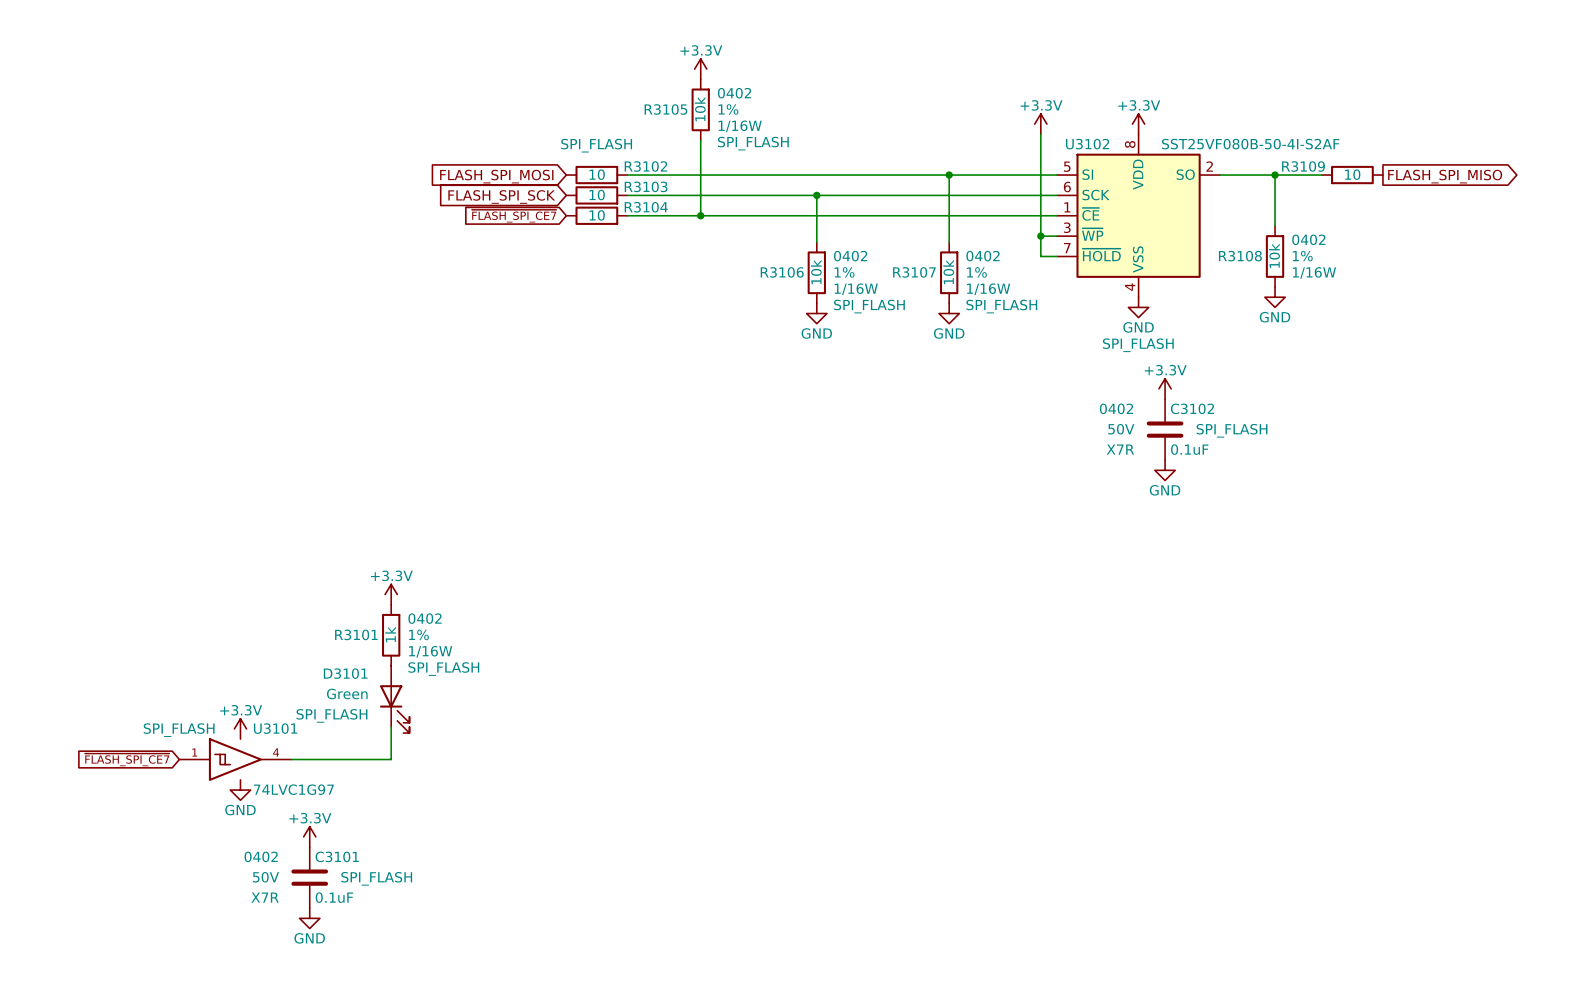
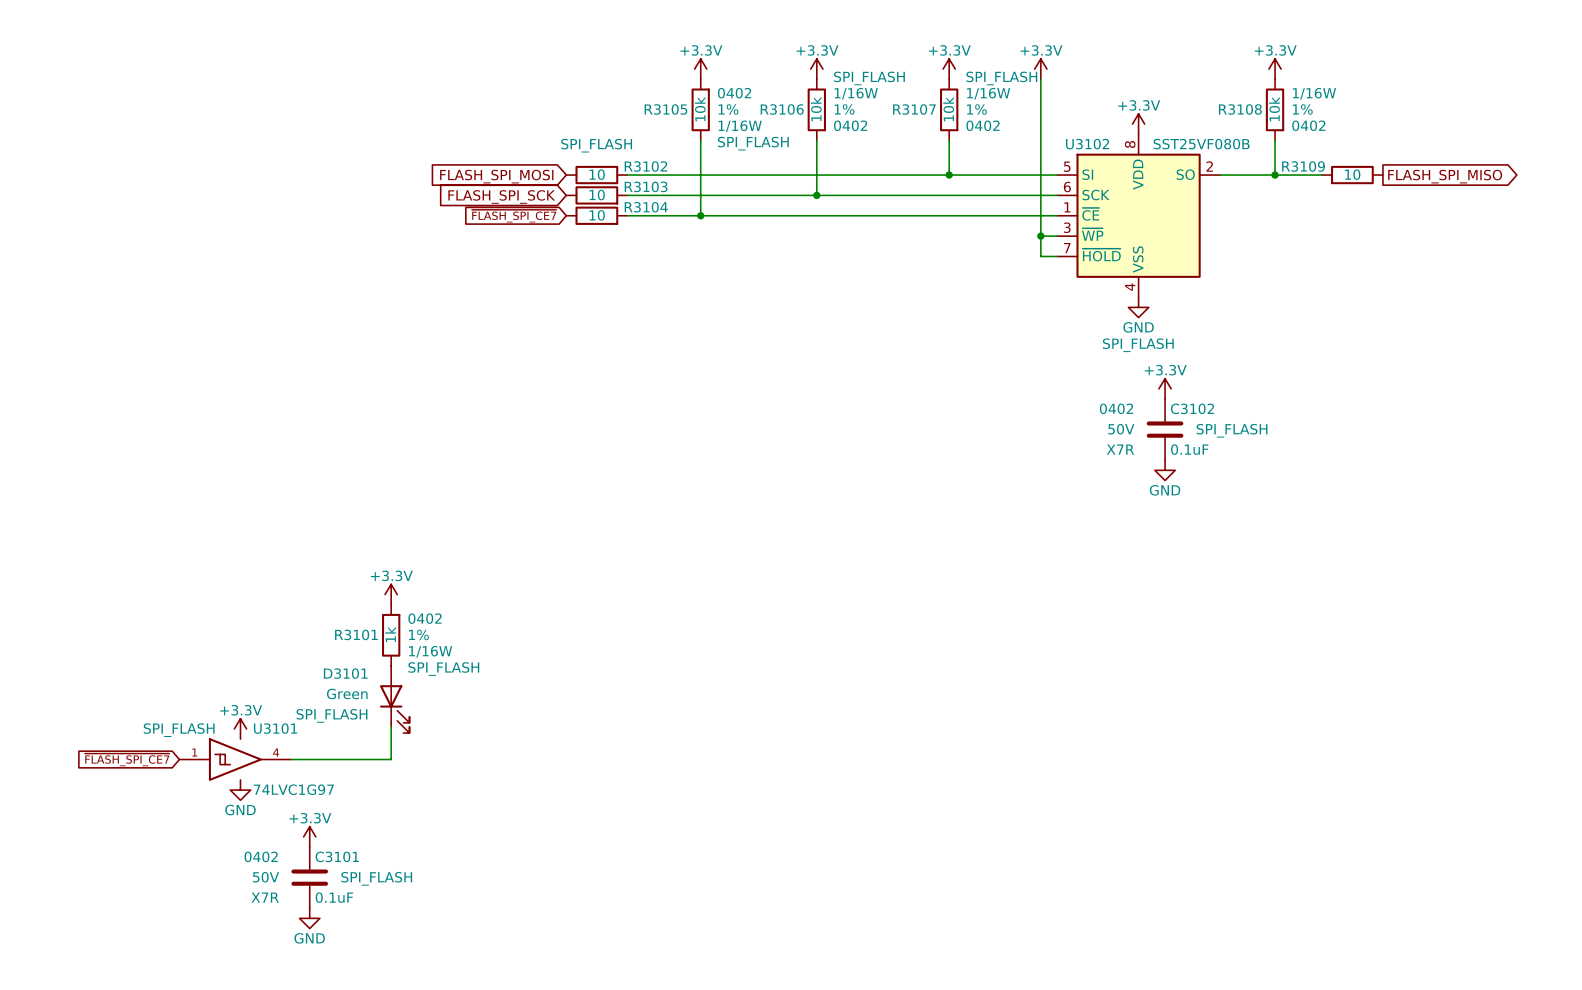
power symbol: none -> +3.3V (816, 69)
power symbol: none -> +3.3V (949, 69)
power symbol: none -> +3.3V (1040, 69)
power symbol: none -> +3.3V (1275, 69)
wire: none -> (1040, 79) (1040, 134)
power symbol: +3.3V (1040, 124) -> none
U3102 value: SST25VF080B-50-4I-S2AF (1250, 144) -> SST25VF080B (1201, 144)
wire: (949, 175) (949, 242) -> (949, 175) (949, 140)
wire: (1275, 175) (1275, 225) -> (1275, 175) (1275, 140)
wire: (816, 195) (816, 242) -> (816, 195) (816, 140)
R3108 text position: 0402 (1308, 239) -> 0402 (1308, 125)
R3106 text position: 0402 (850, 256) -> 0402 (850, 125)
R3107 text position: 0402 (983, 256) -> 0402 (983, 125)
R3108 position: (1275, 256) -> (1275, 109)
R3106 position: (816, 272) -> (816, 109)
R3107 position: (949, 272) -> (949, 109)
R3108 text position: 1/16W (1314, 272) -> 1/16W (1314, 93)
R3106 text position: 1/16W (856, 289) -> 1/16W (856, 93)
R3107 text position: 1/16W (988, 289) -> 1/16W (988, 93)
power symbol: GND (1275, 297) -> none
R3106 text position: SPI_FLASH (869, 306) -> SPI_FLASH (869, 78)
R3107 text position: SPI_FLASH (1001, 306) -> SPI_FLASH (1001, 78)
power symbol: GND (816, 313) -> none
power symbol: GND (949, 313) -> none

